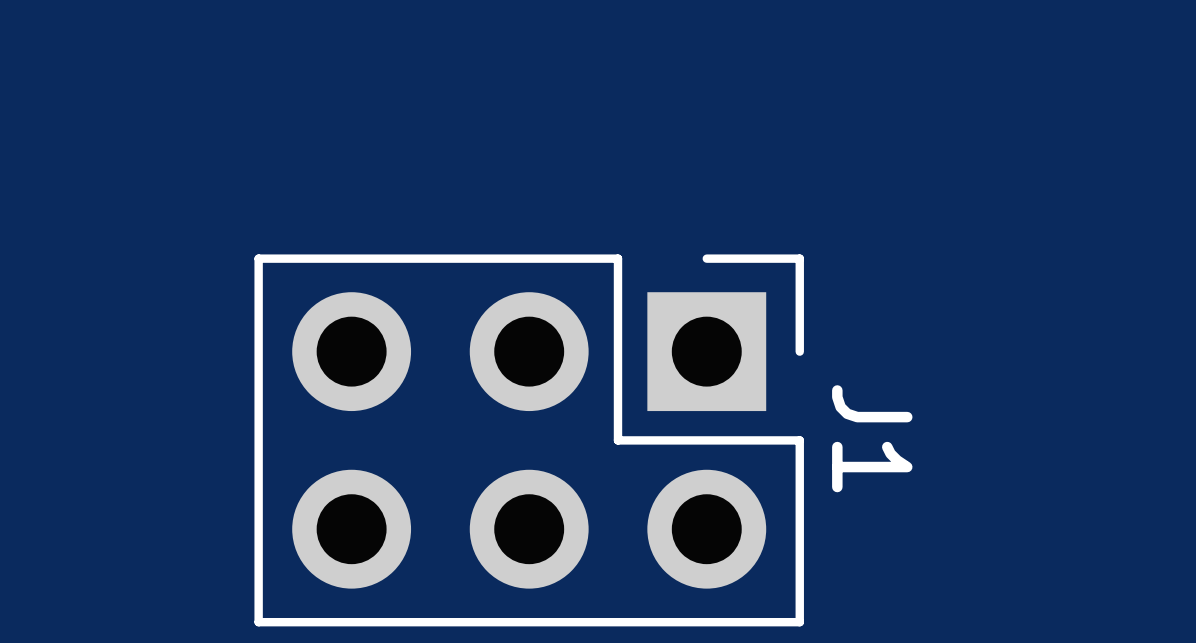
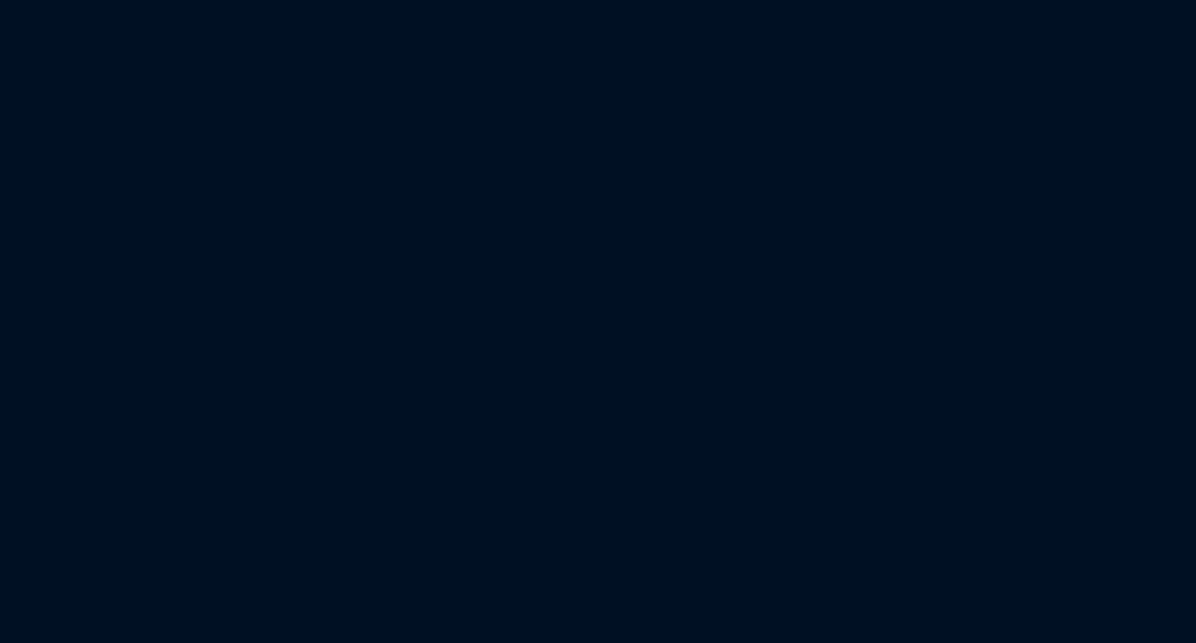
J1: (529, 440) -> none

